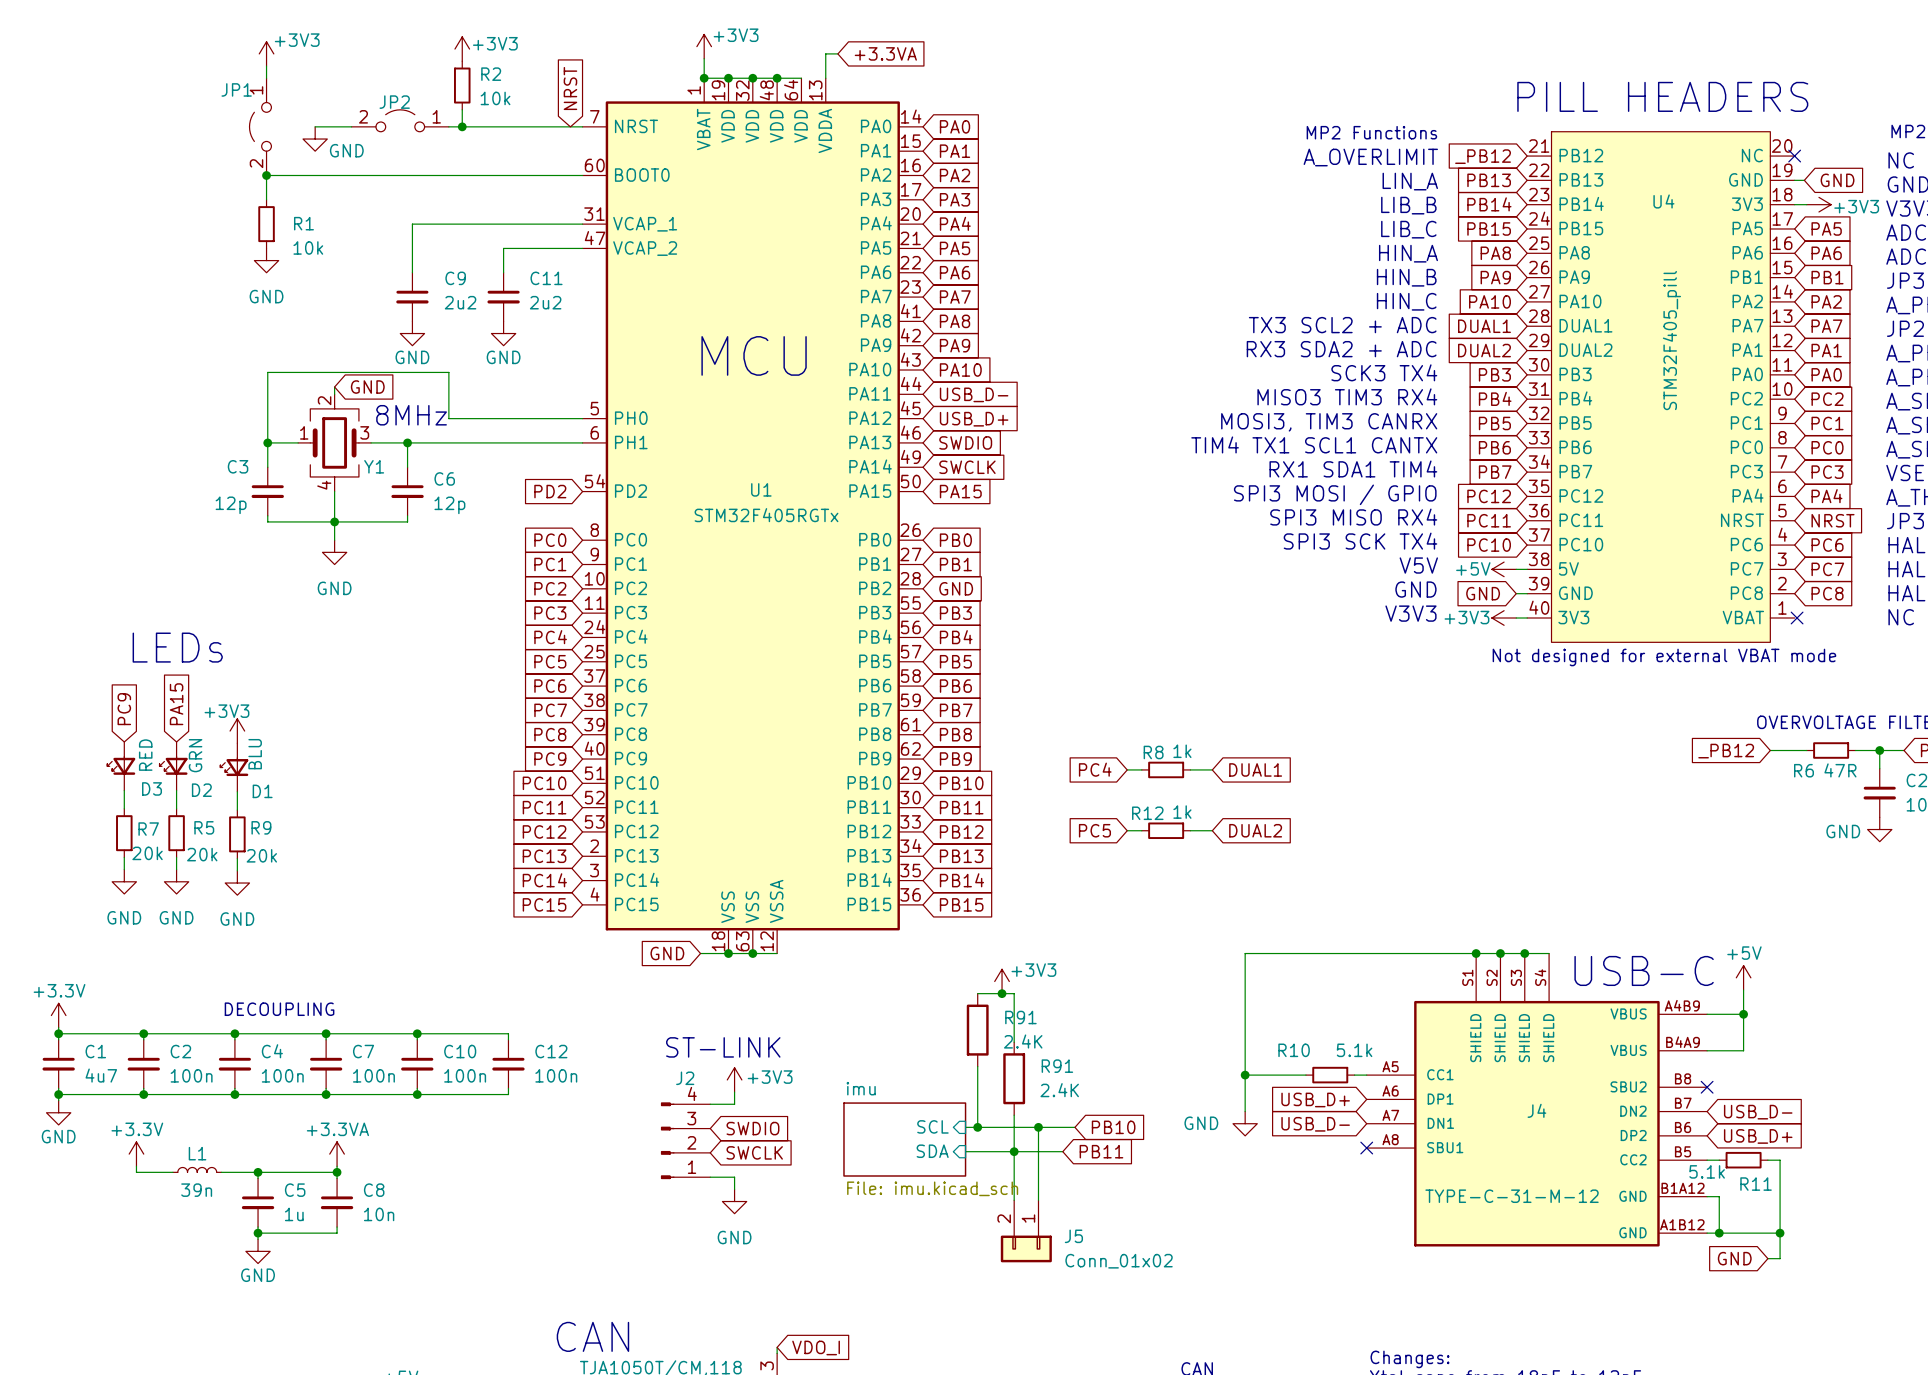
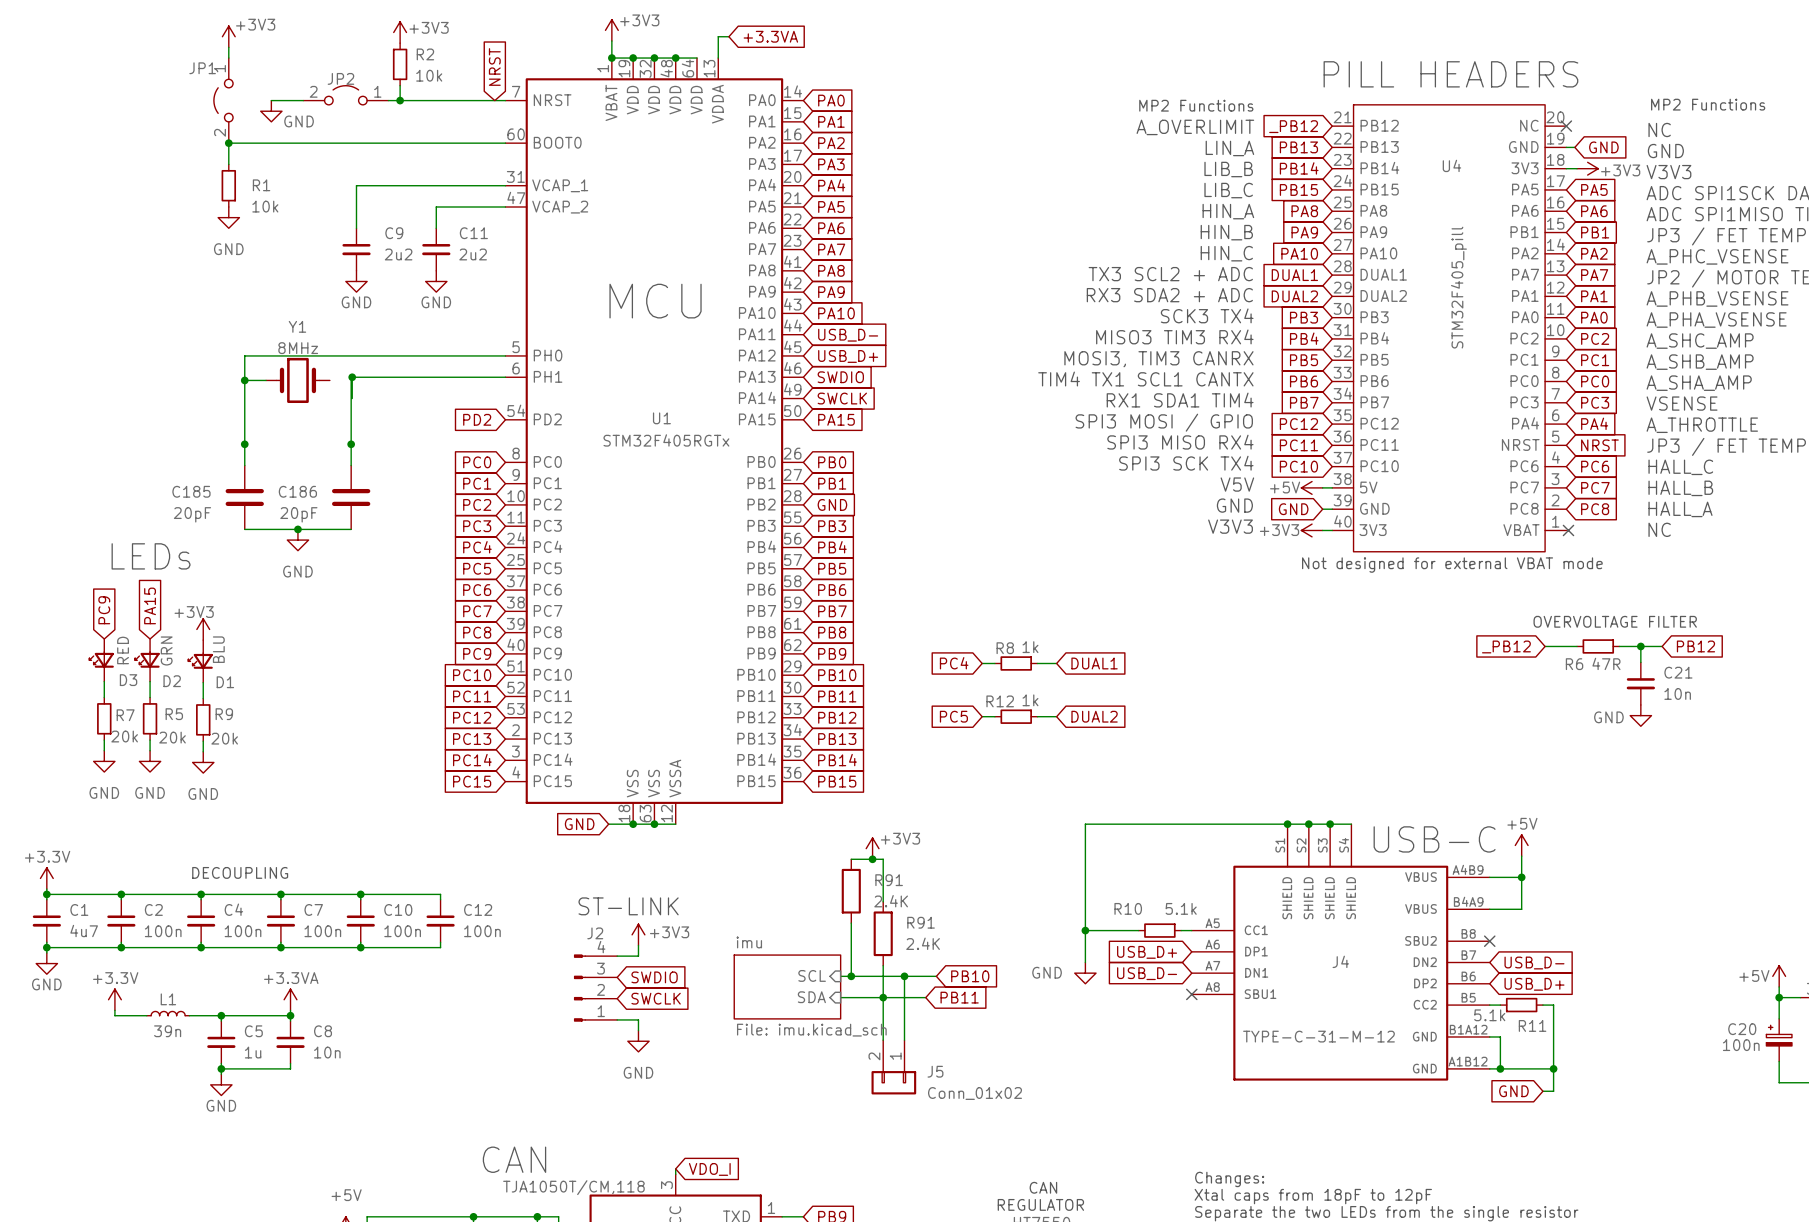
wire: (334, 387) (334, 394) -> none
global label: GND (367, 387) -> none
Y1 symbol: [298, 394, 372, 492] -> [266, 357, 330, 404]
Y1 value: none -> 8MHz (298, 348)
text: 8MHz (411, 415) -> none
wire: (448, 418) (448, 372) (267, 372) (267, 467) -> (388, 355) (244, 355) (244, 465)
wire: (267, 442) (298, 442) -> none
junction position: (267, 442) -> (244, 380)
wire: (371, 442) (406, 442) -> (351, 465) (351, 377)
wire: none -> (244, 380) (266, 380)
Y1 name position: Y1 (374, 466) -> Y1 (297, 326)
C3: 12p (267, 491) -> none
wire: (334, 491) (334, 540) -> none
C6: 12p (407, 491) -> none
wire: (267, 515) (267, 521) (407, 521) (407, 515) -> none
junction: none -> (244, 444)
junction: none -> (351, 444)
junction: (334, 521) -> none
power symbol position: GND (334, 552) -> GND (297, 540)
C185: none -> 20pF (244, 497)
C186: none -> 20pF (351, 497)
wire: none -> (244, 529) (351, 529)
junction: none -> (297, 529)

